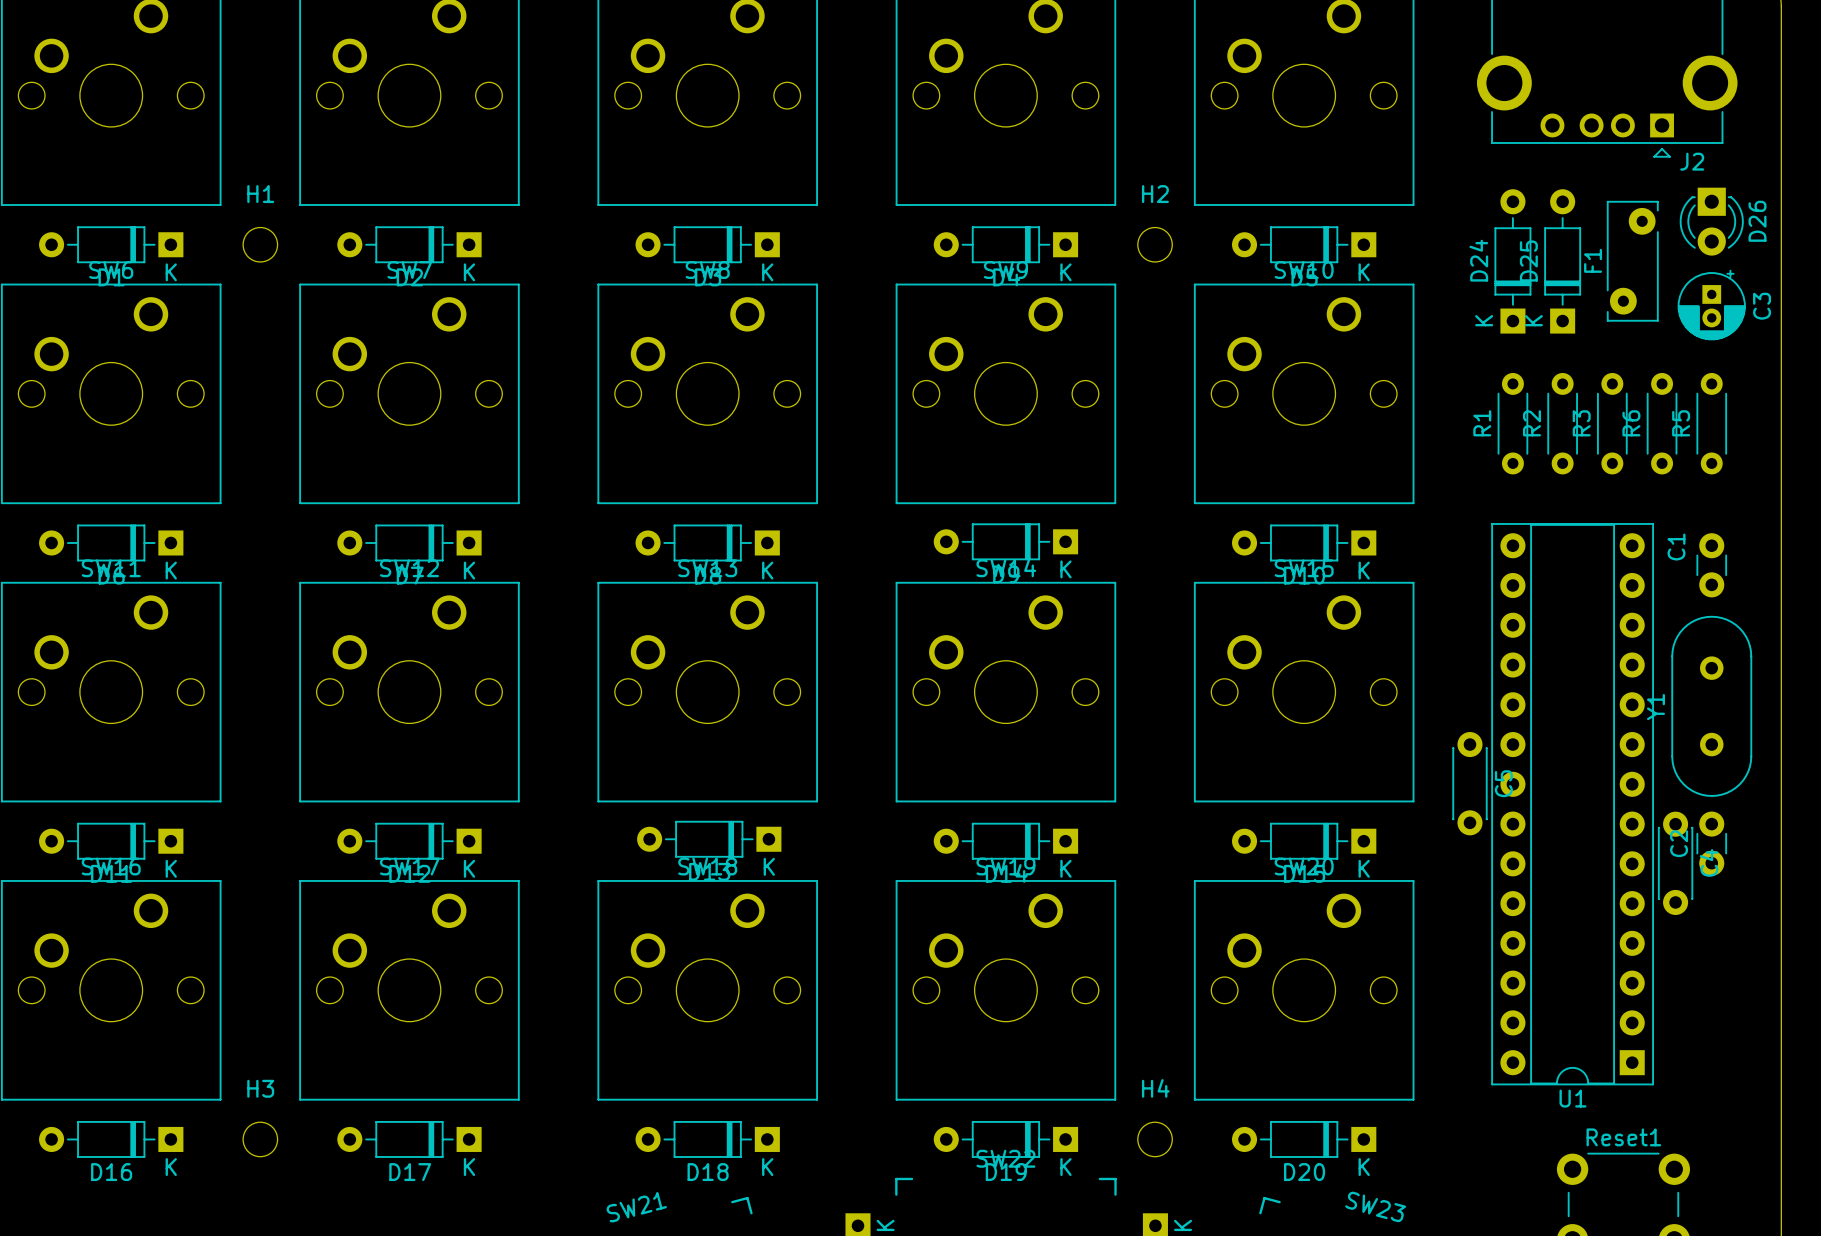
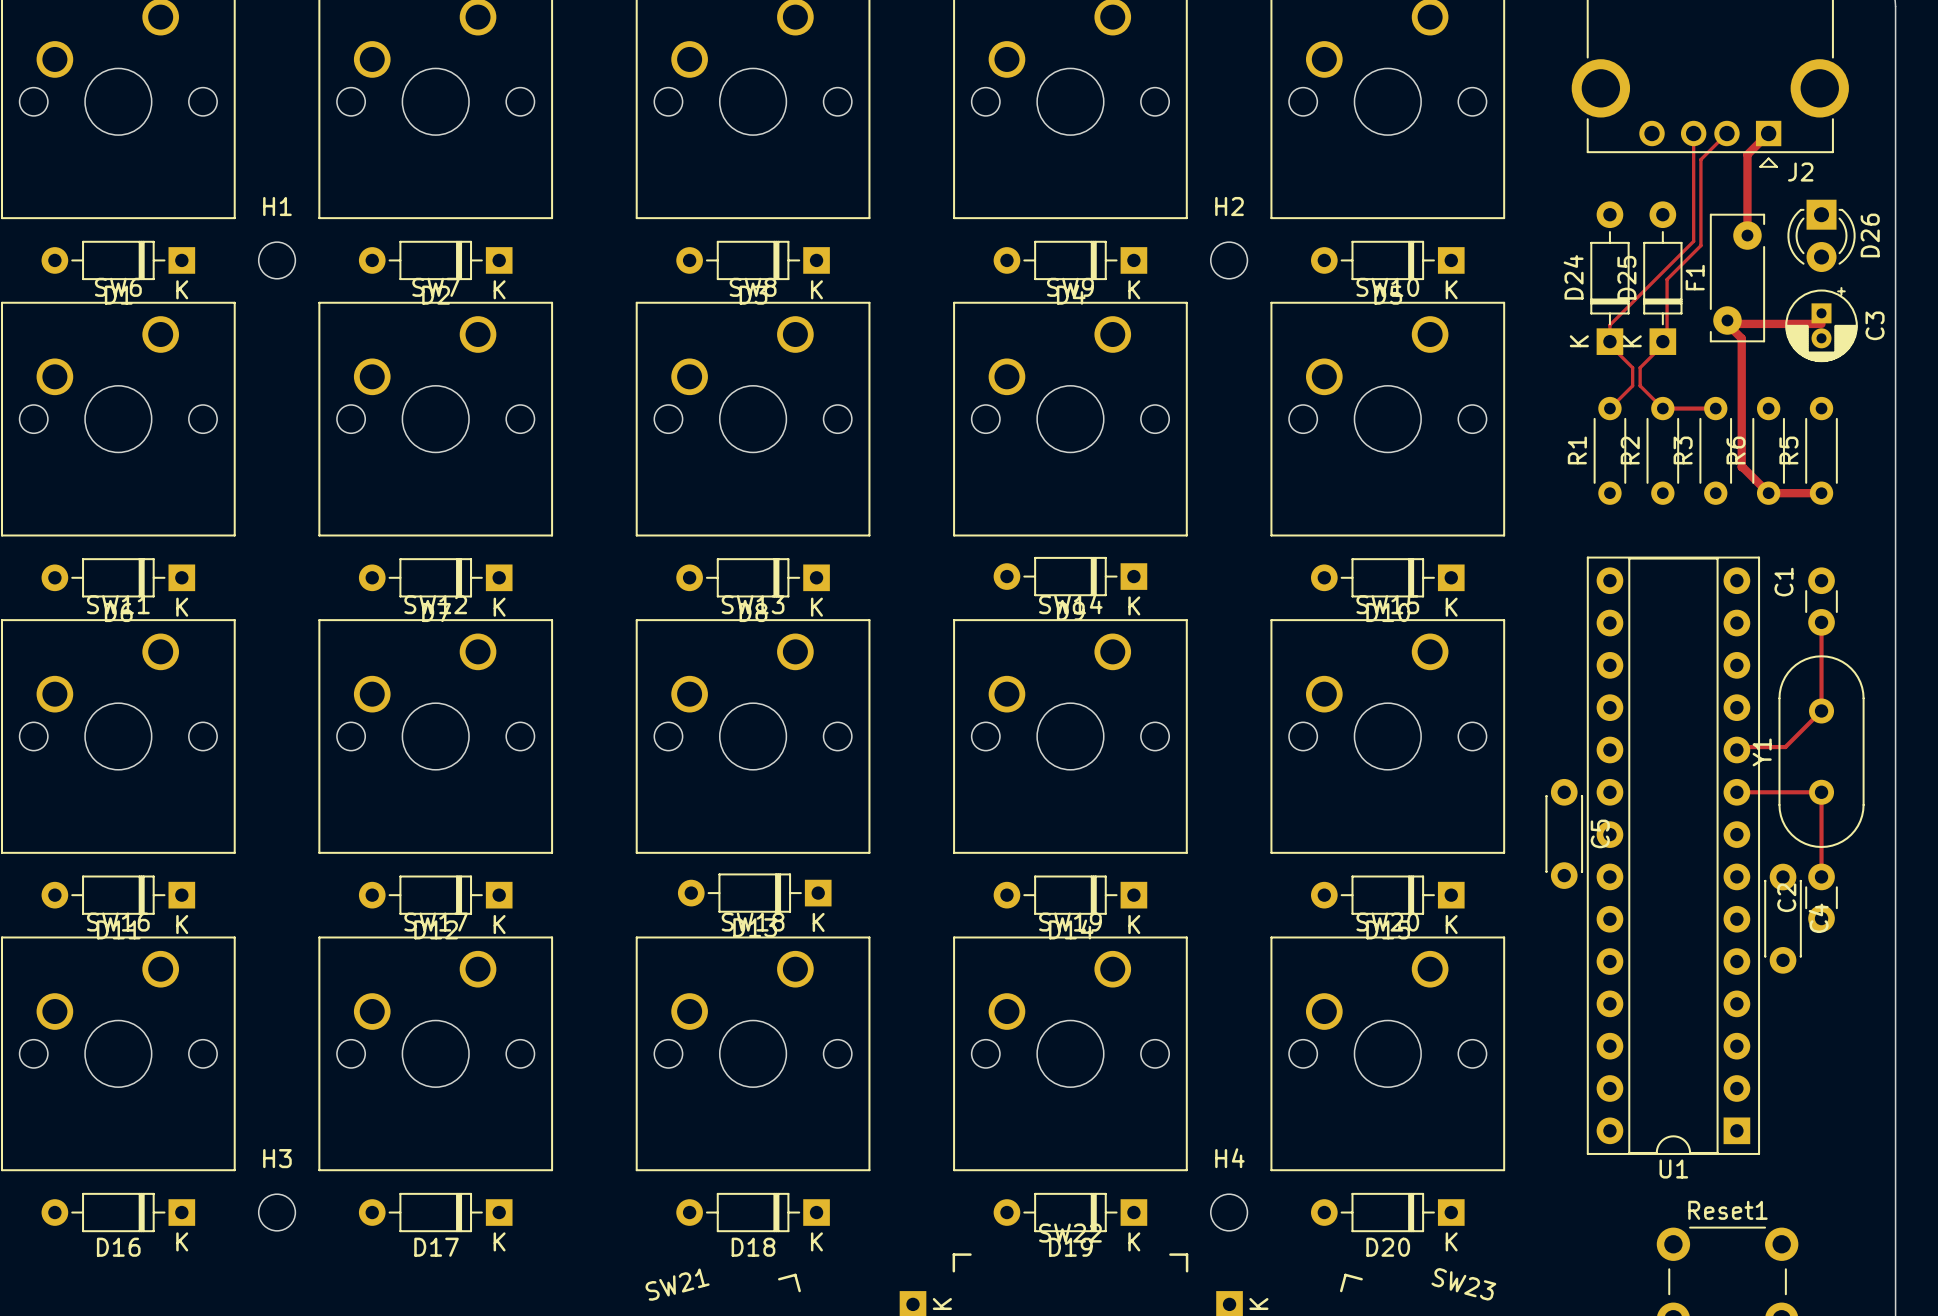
top track: none -> (1693, 133) (1693, 241) (1609, 325) (1609, 345) (1632, 367) (1632, 385) (1609, 408)
top track: none -> (1726, 133) (1700, 159) (1700, 245) (1667, 279) (1667, 340) (1640, 367) (1640, 385) (1662, 408) (1715, 408)
top track: none -> (1768, 133) (1747, 154) (1747, 239)
top track: none -> (1821, 323) (1726, 324) (1741, 338) (1741, 467) (1768, 493) (1821, 493)
top track: none -> (1821, 622) (1821, 711) (1785, 747) (1739, 747) (1736, 749)
top track: none -> (1736, 792) (1821, 792) (1821, 876)

